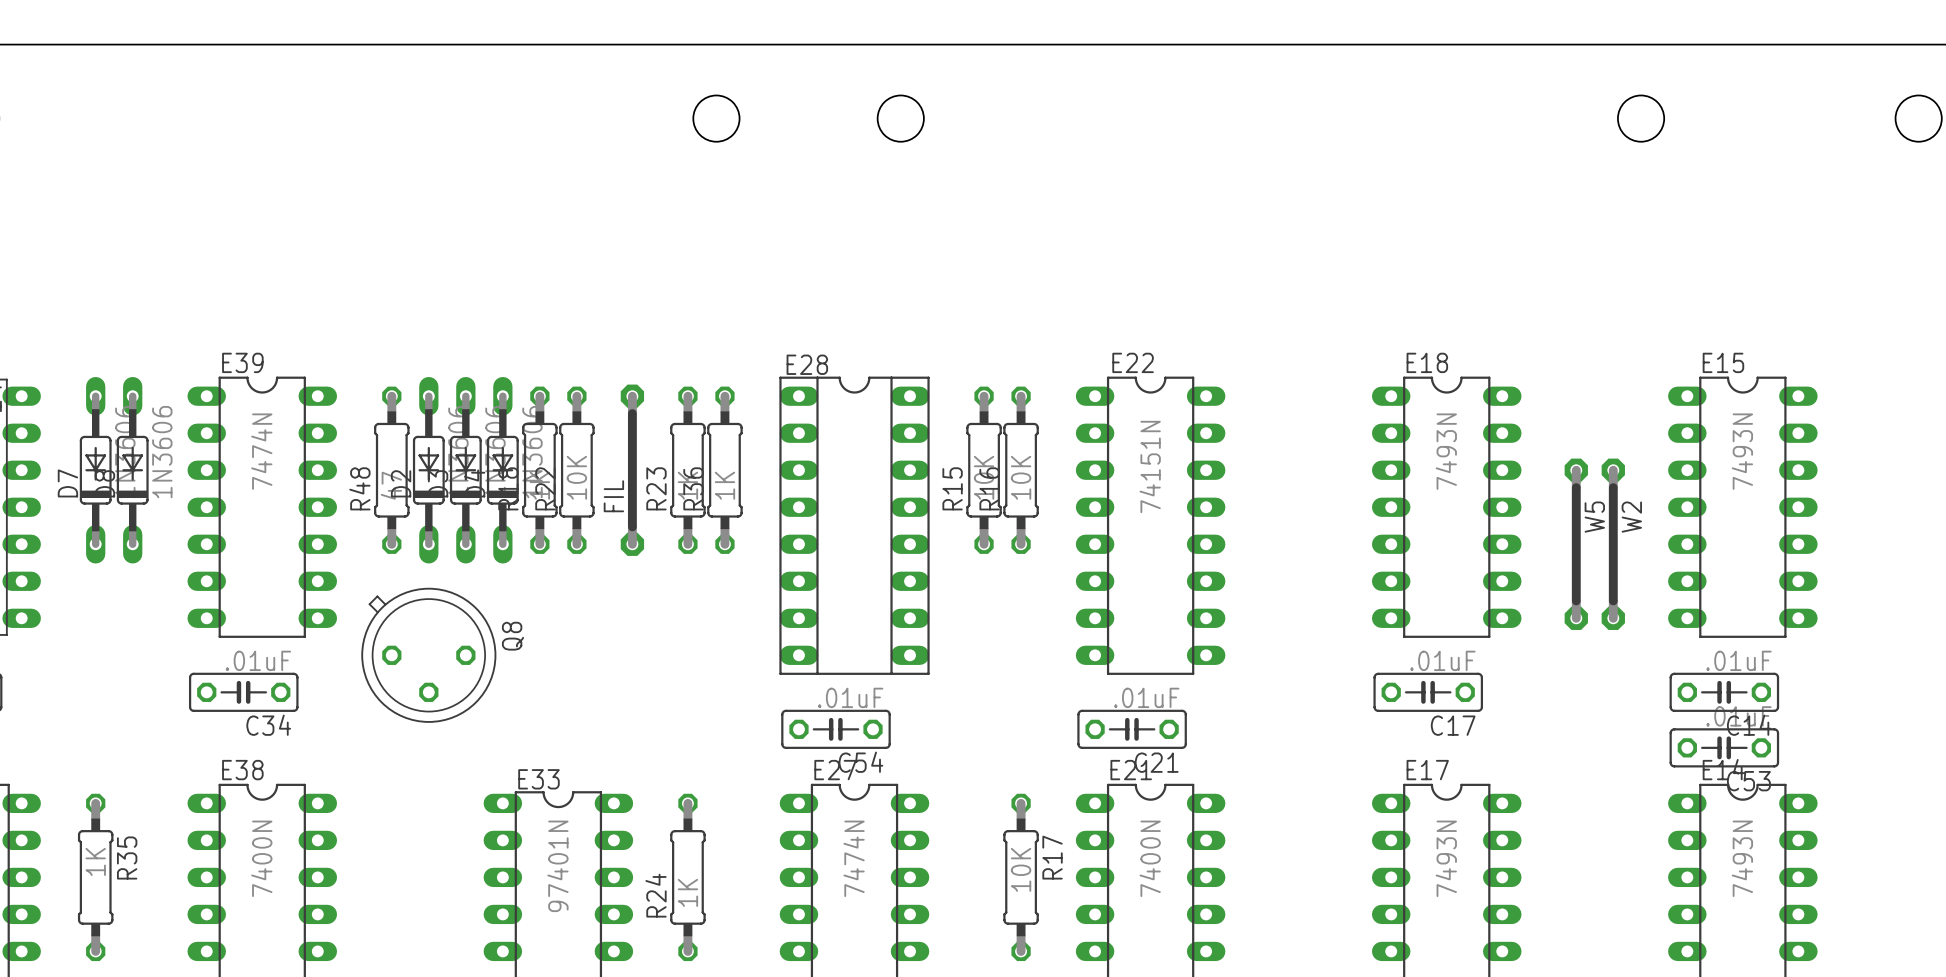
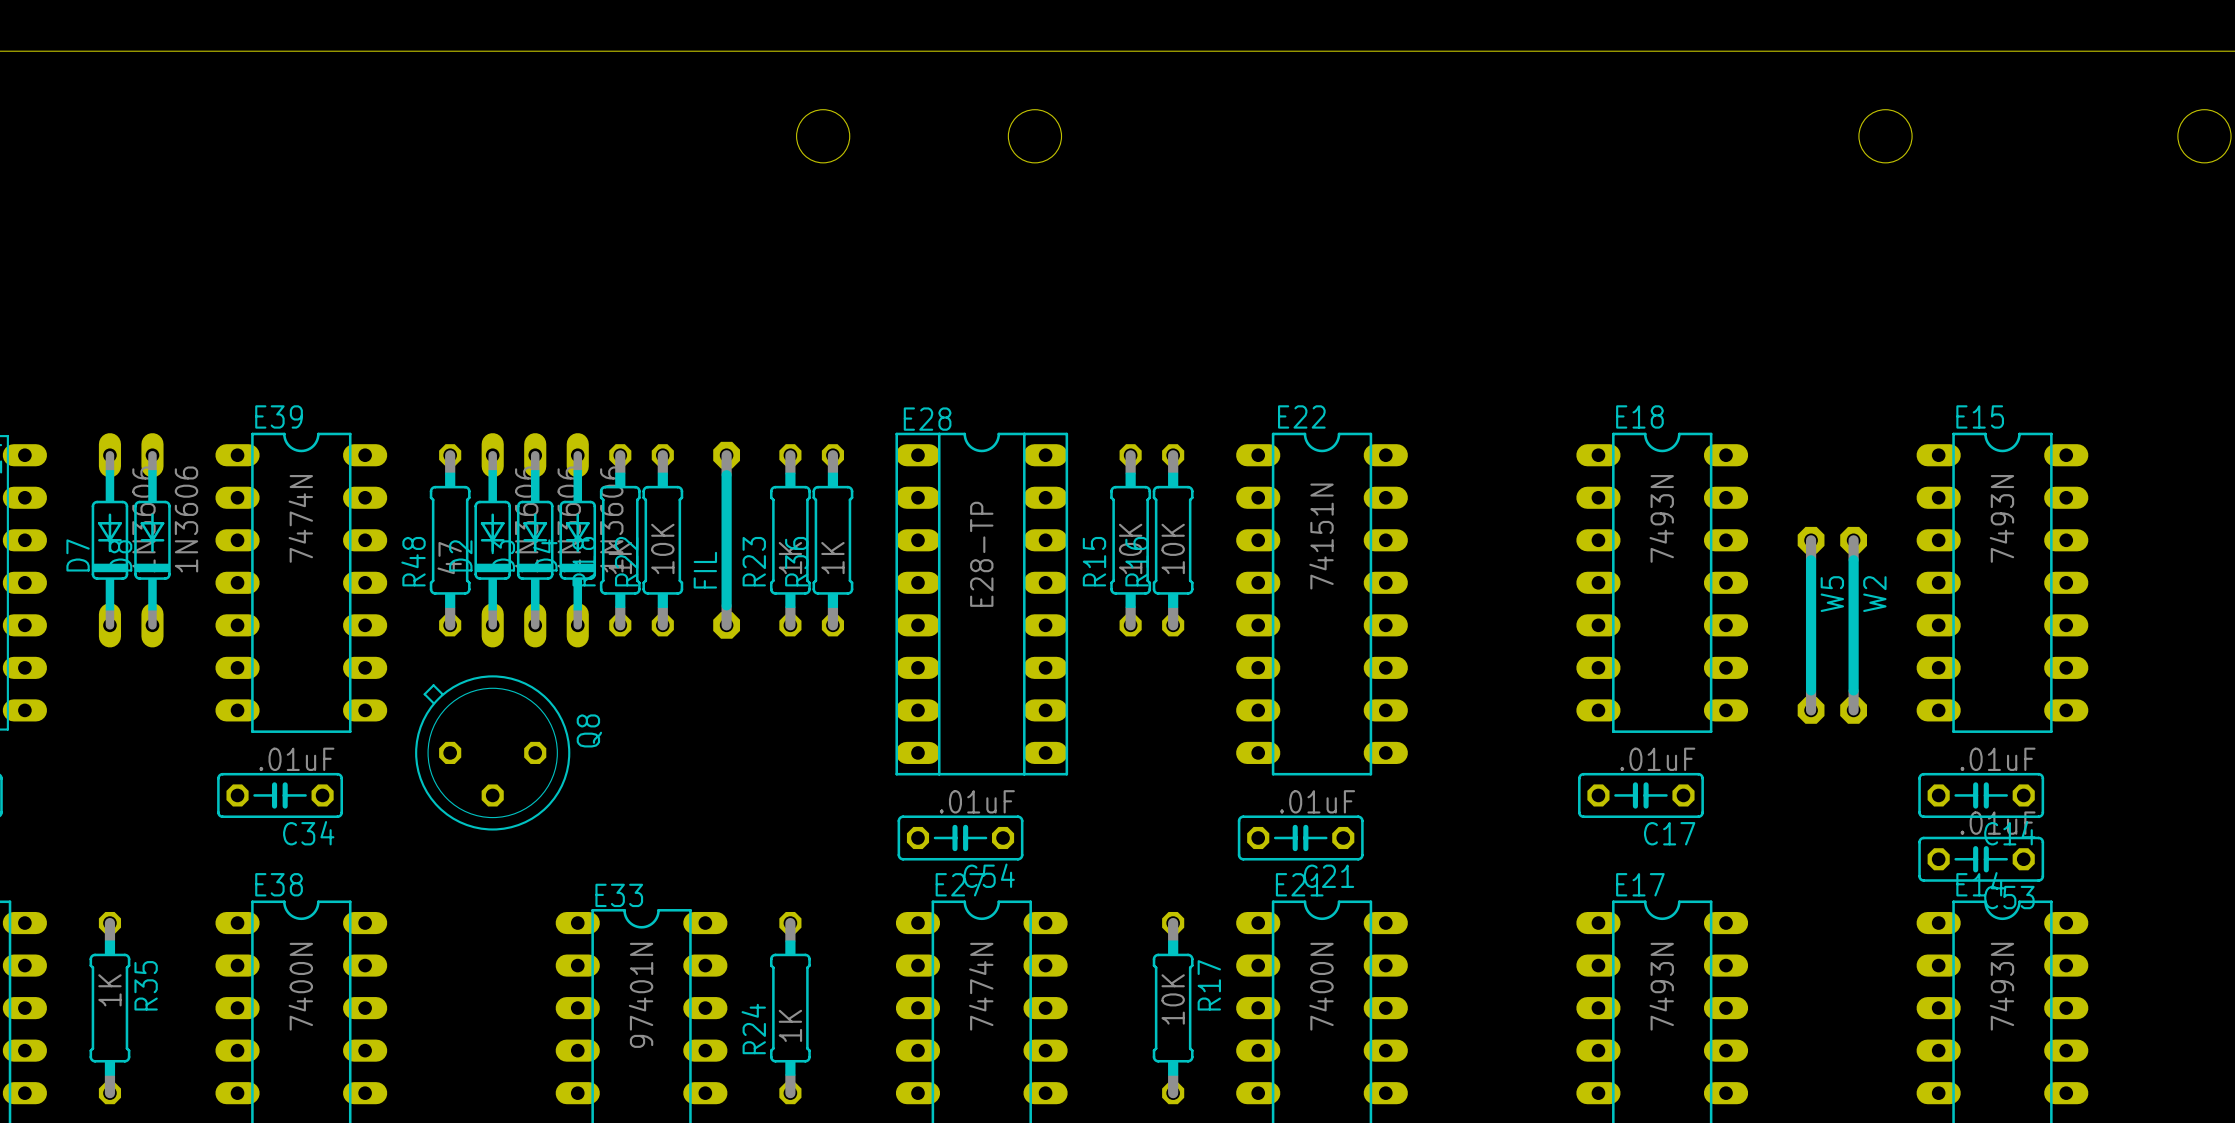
E28 value: none -> E28-TP (981, 554)

